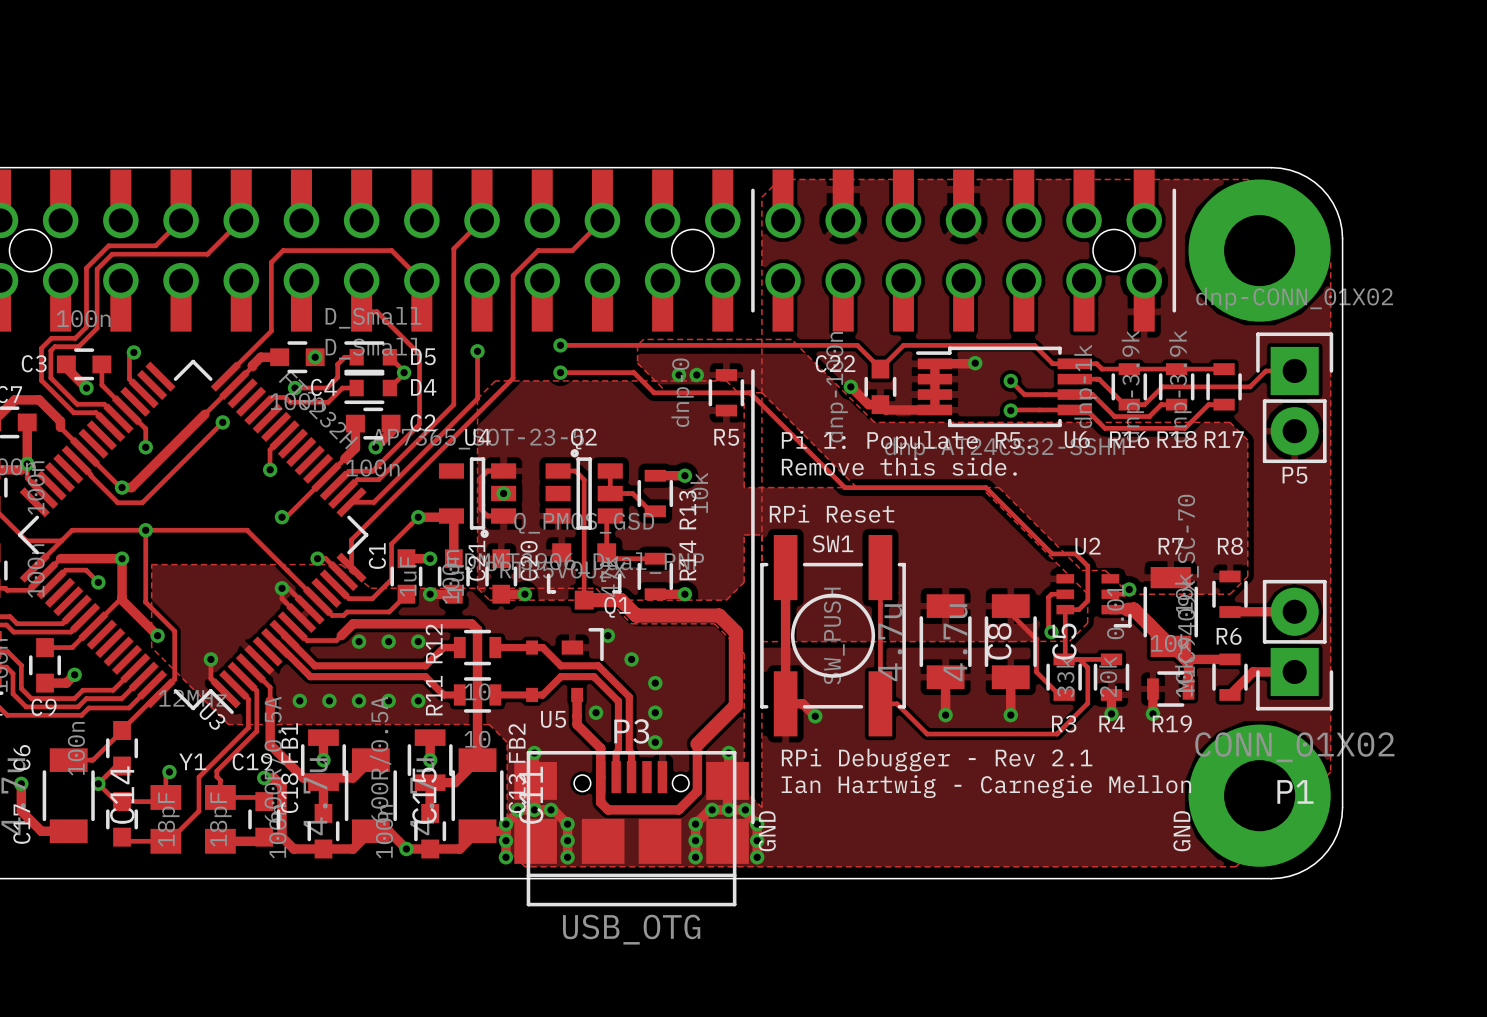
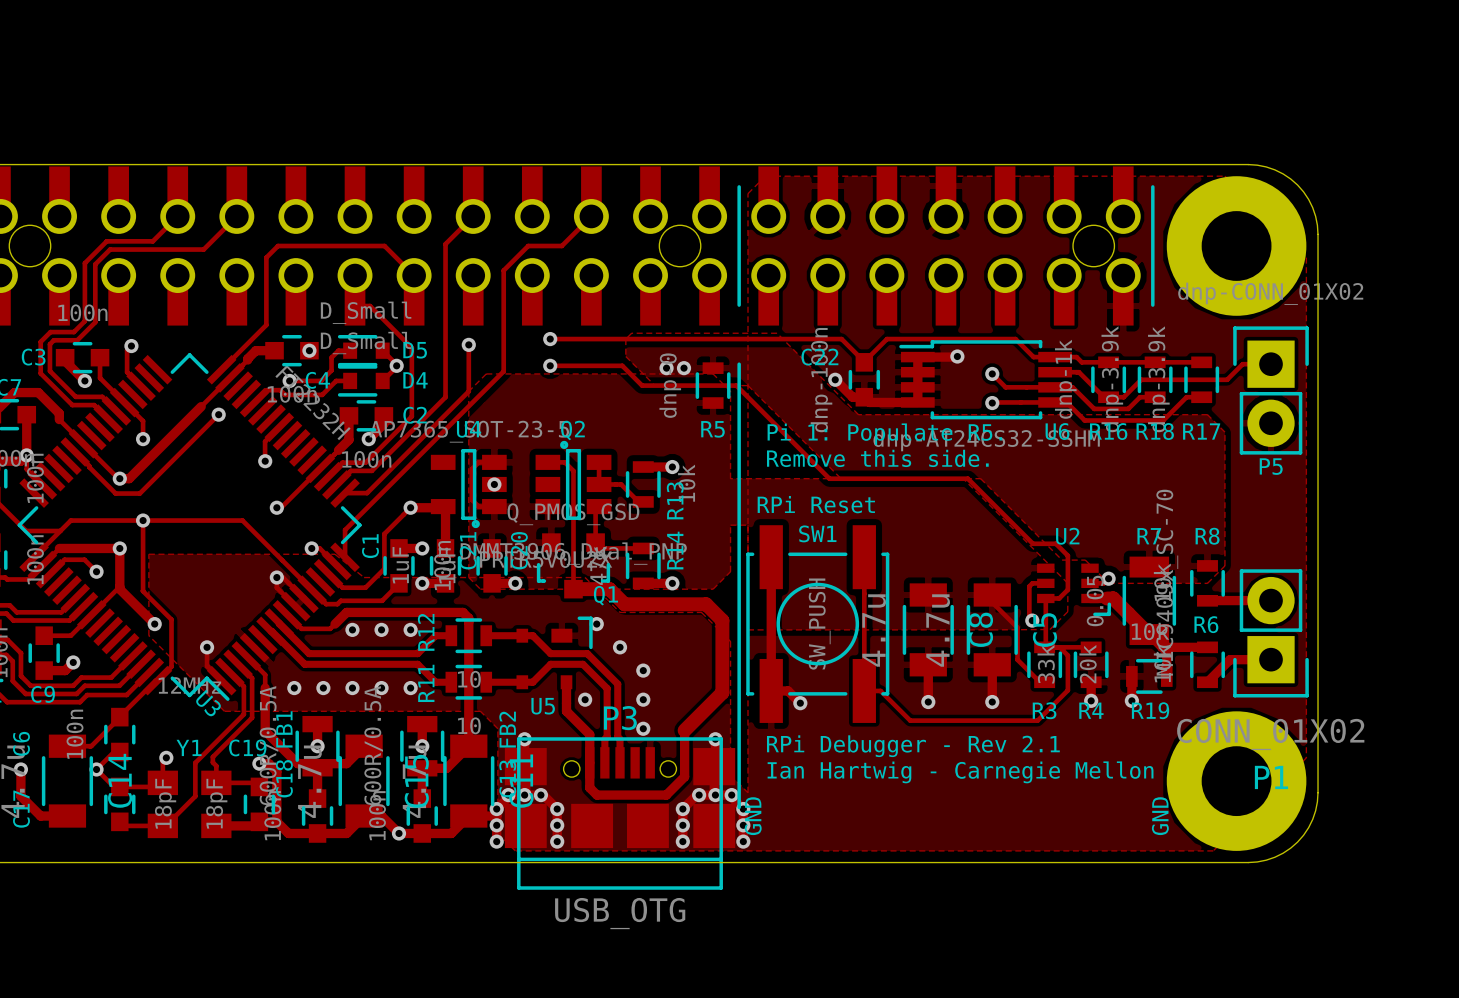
R7 value: 0.01 (1115, 611) -> 0.05 (1095, 600)

